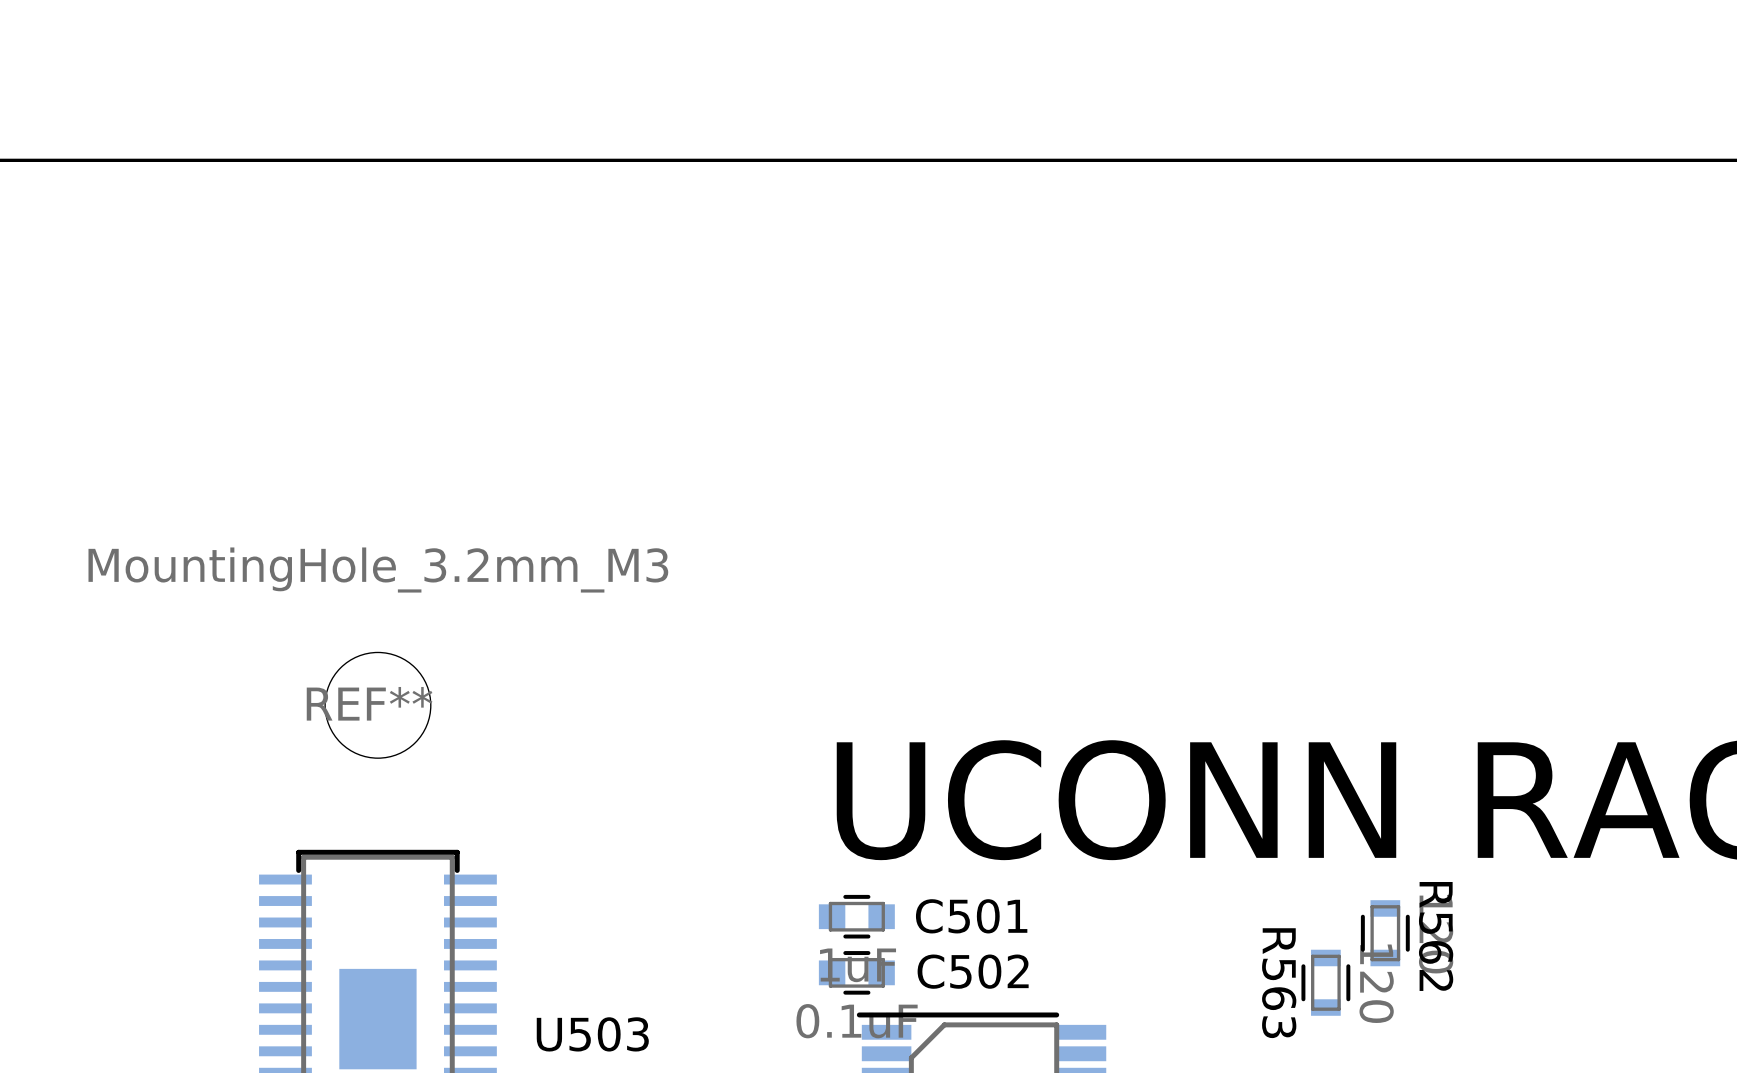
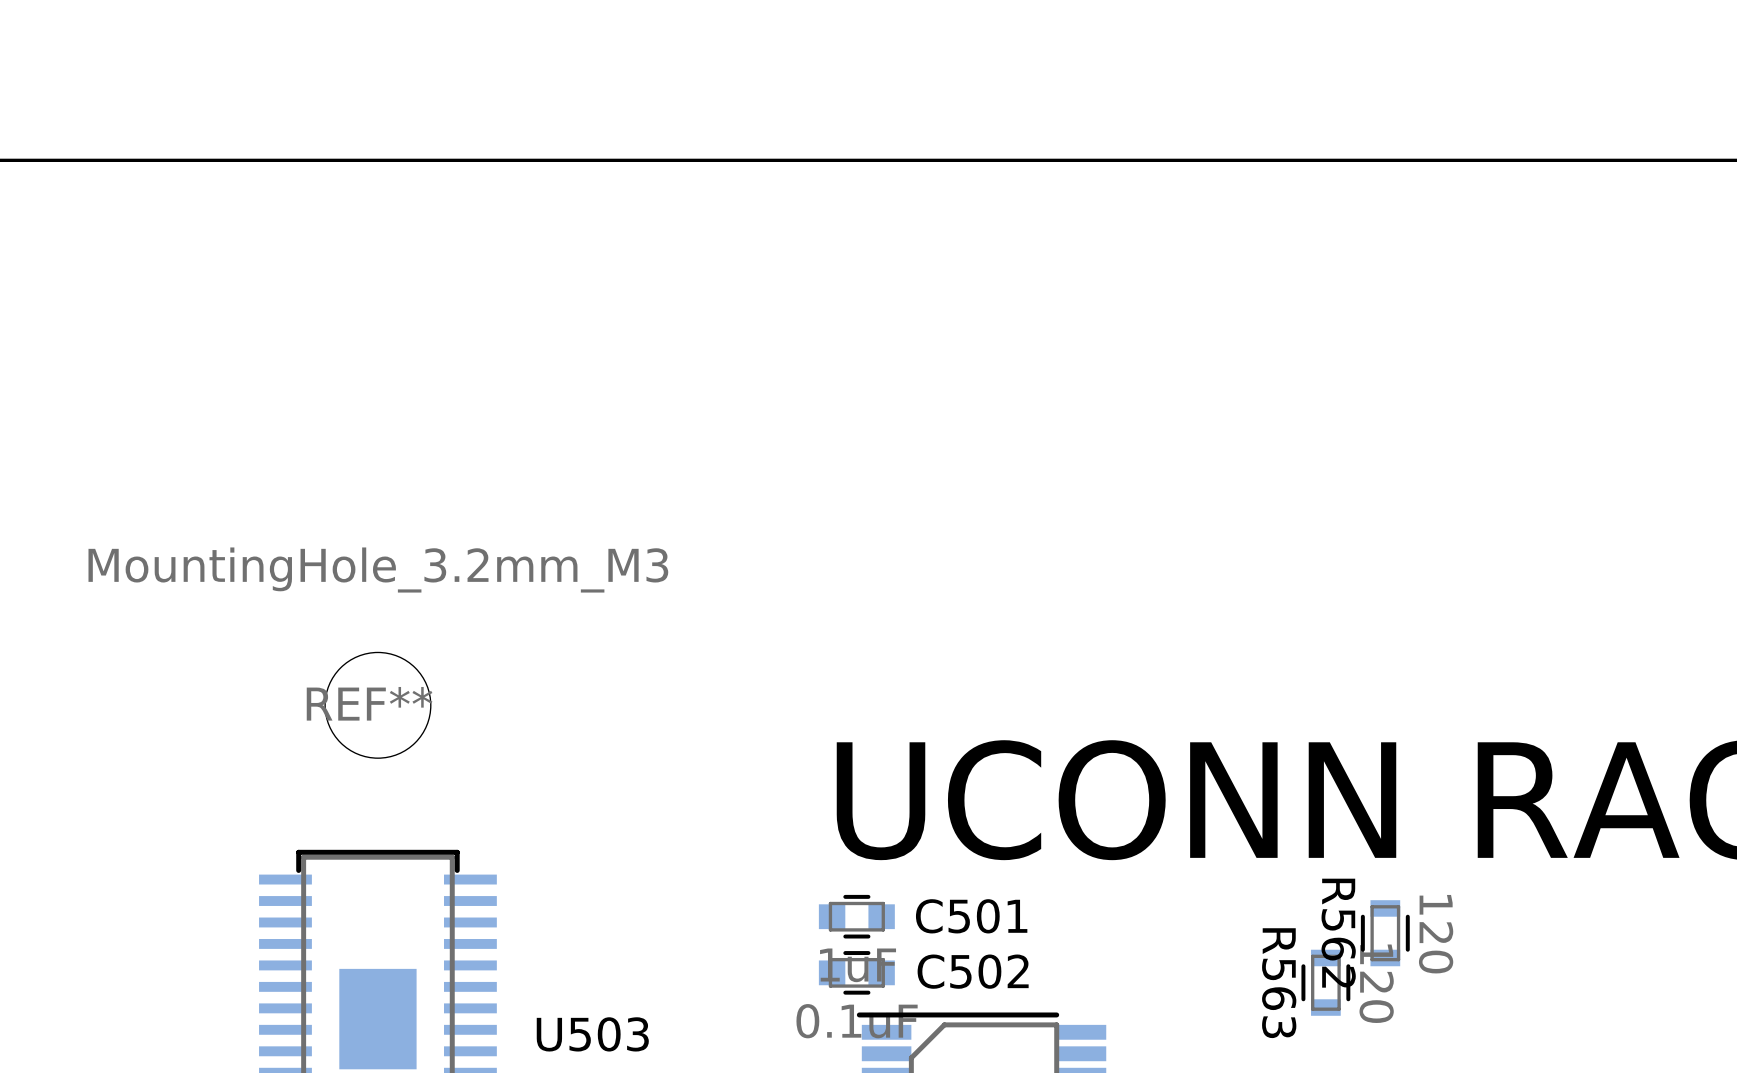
R562 name position: R562 (1436, 936) -> R562 (1338, 933)

